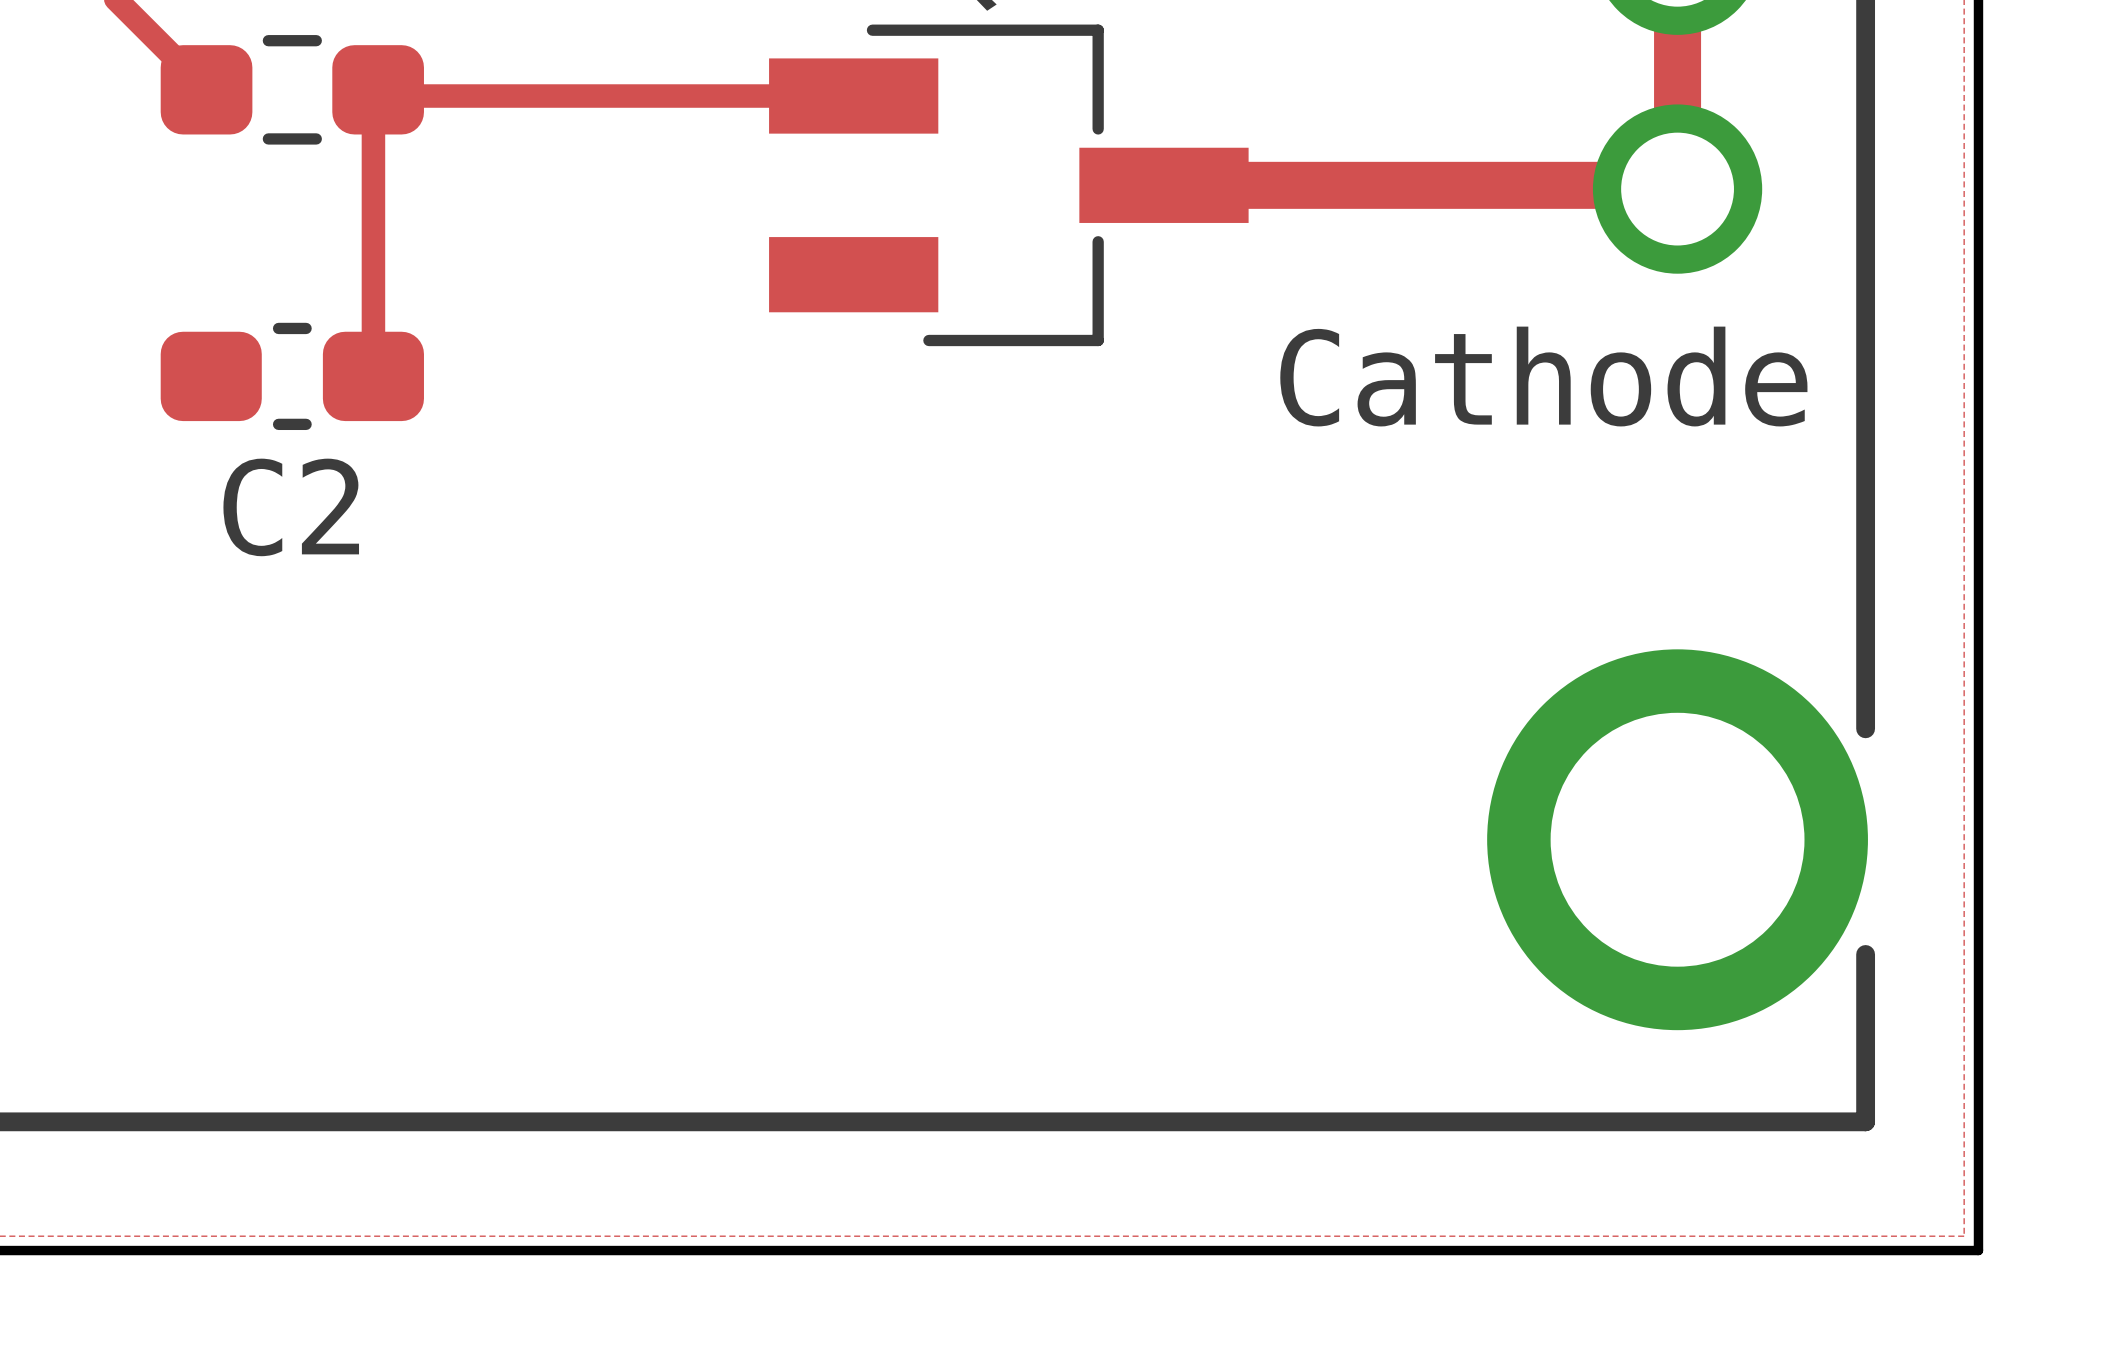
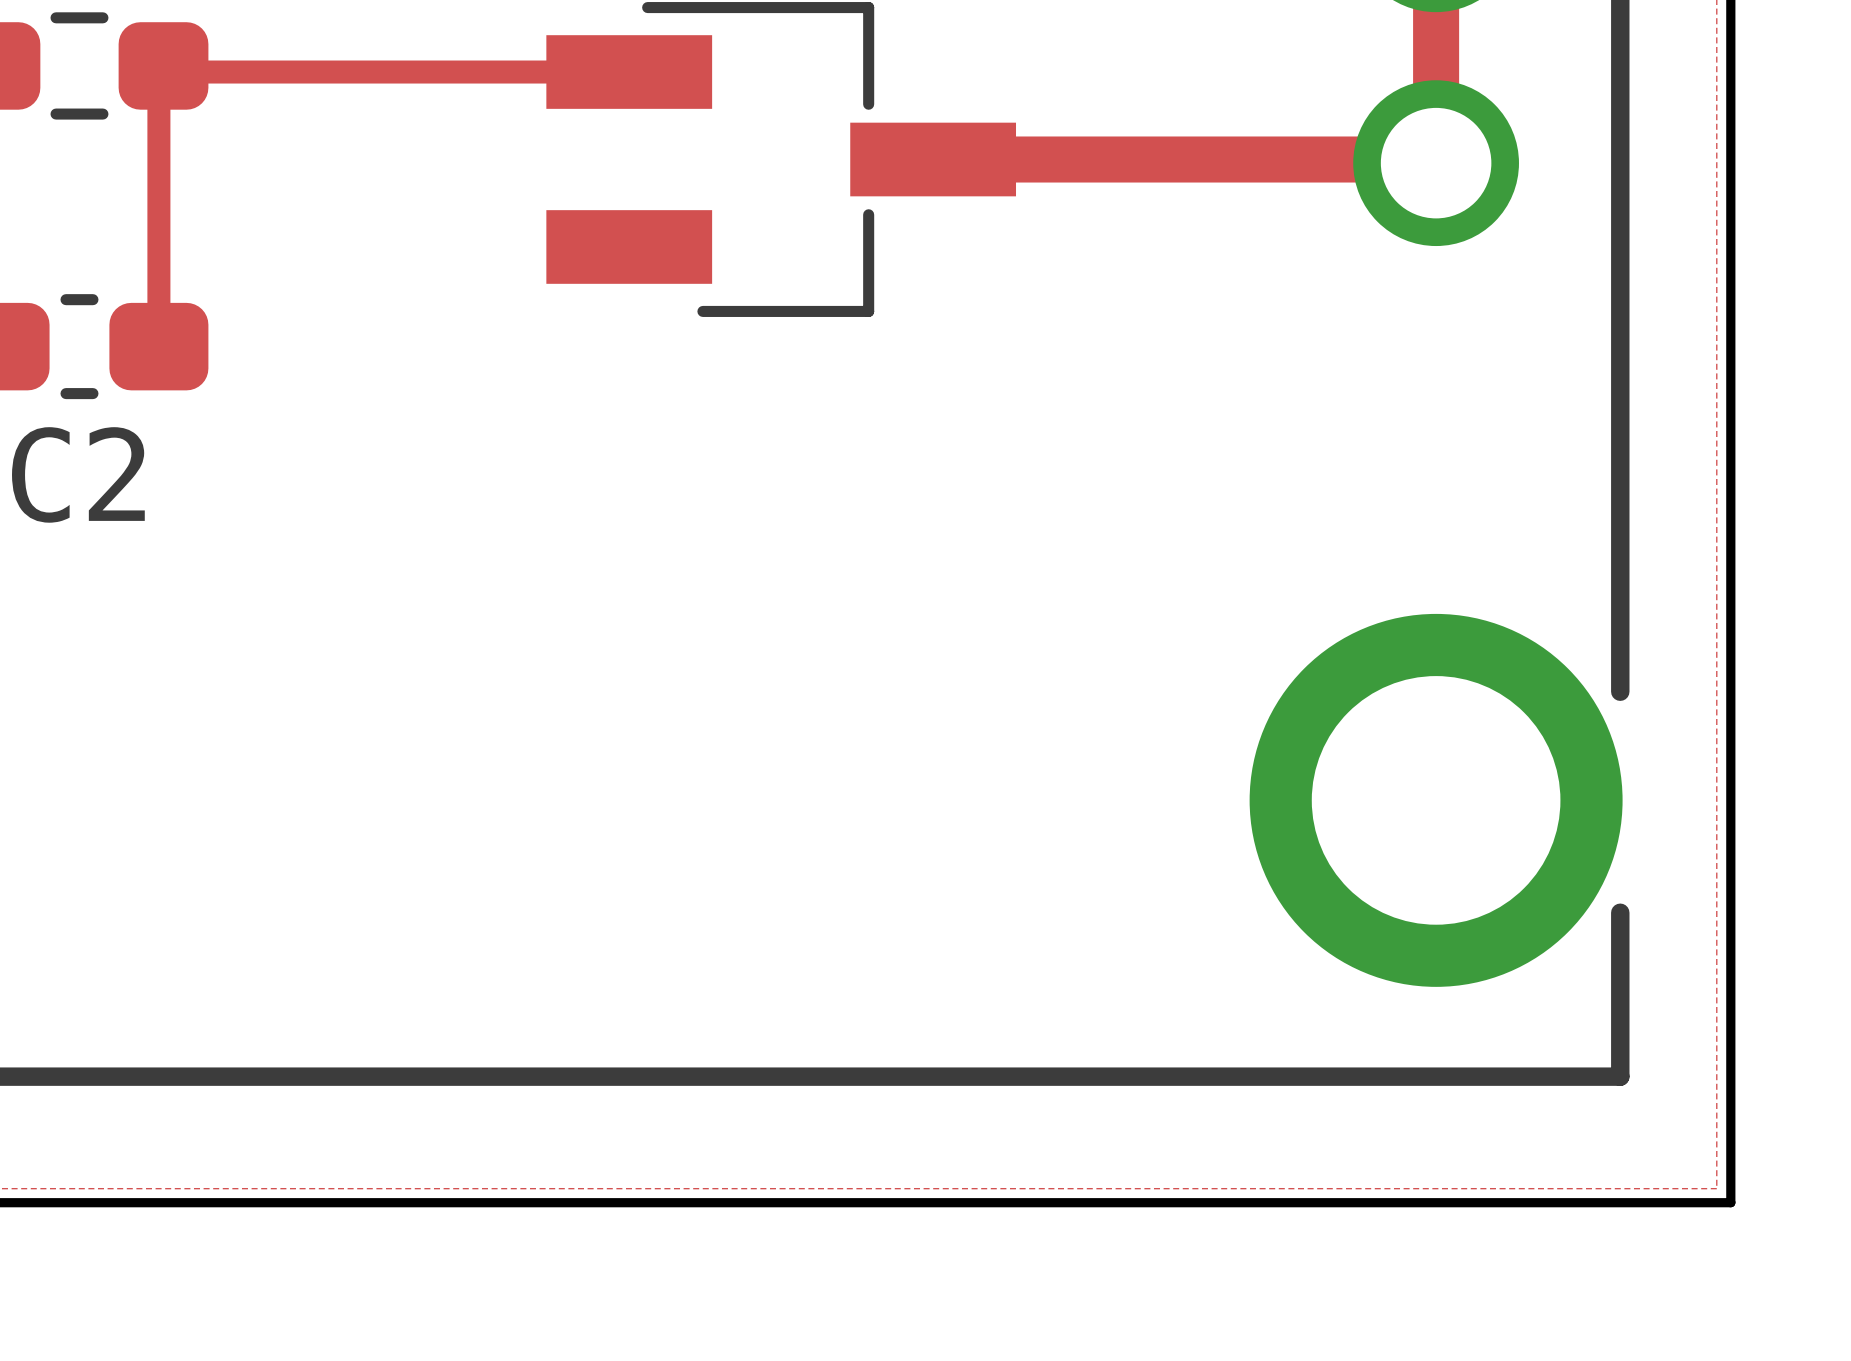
text: Cathode (1543, 376) -> none

